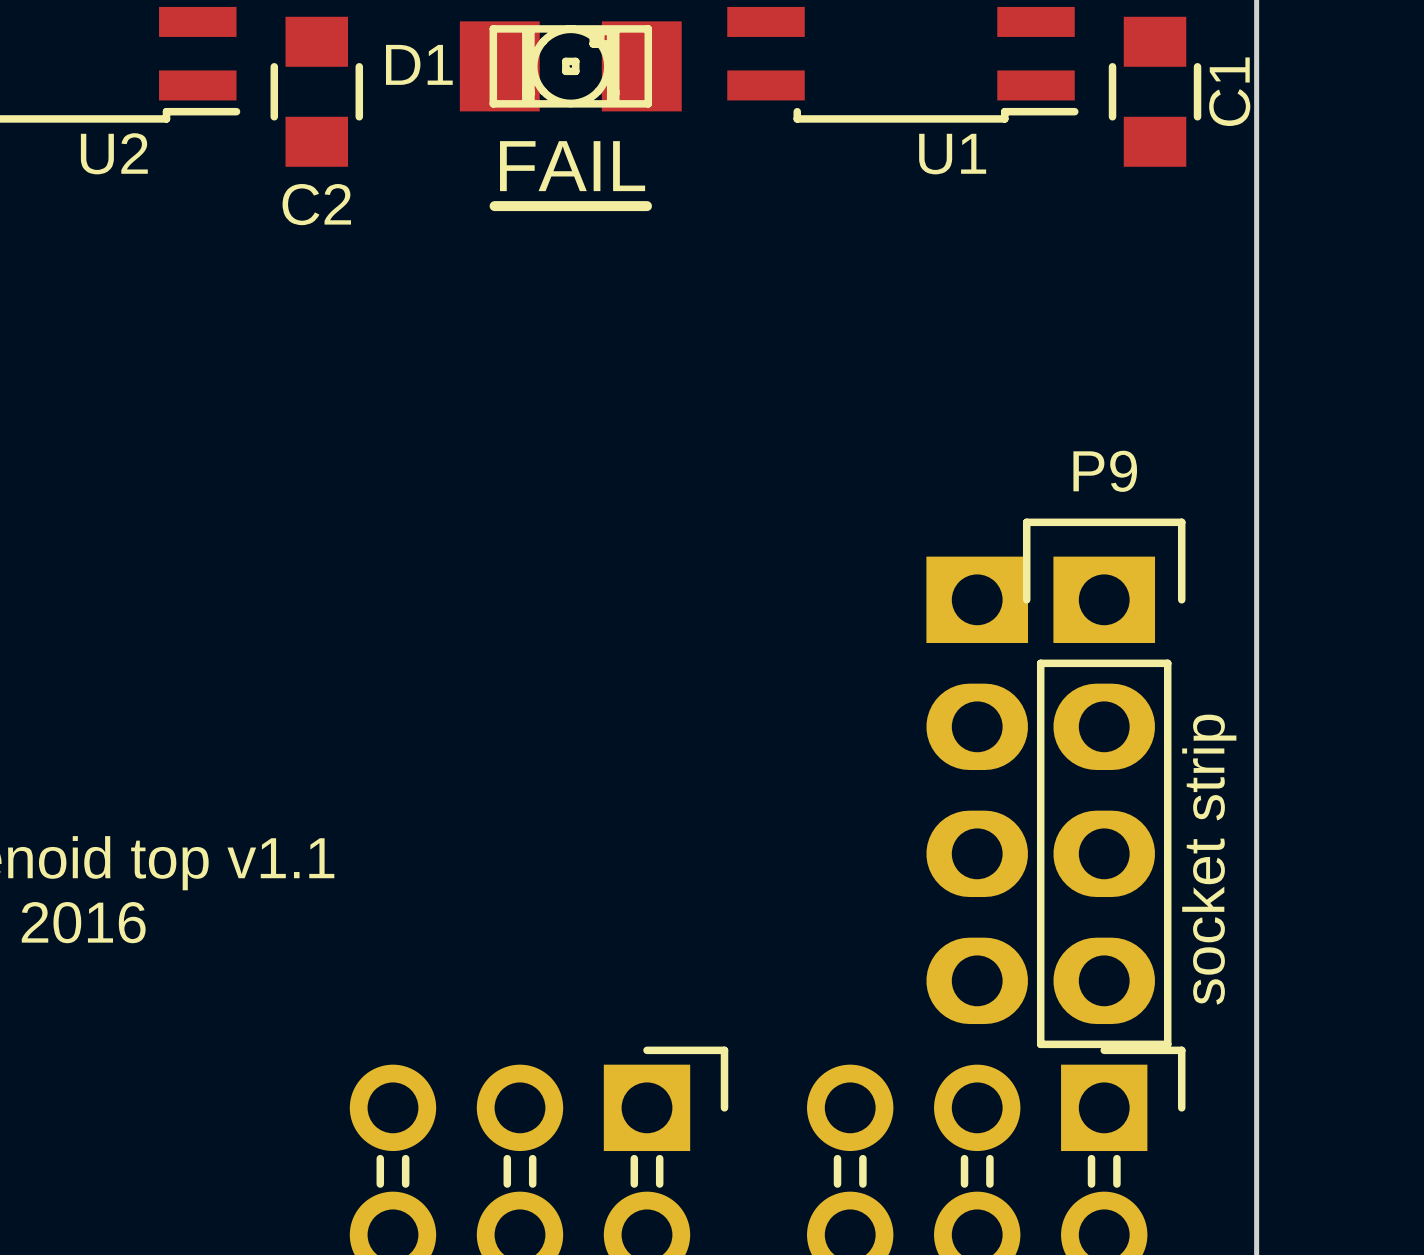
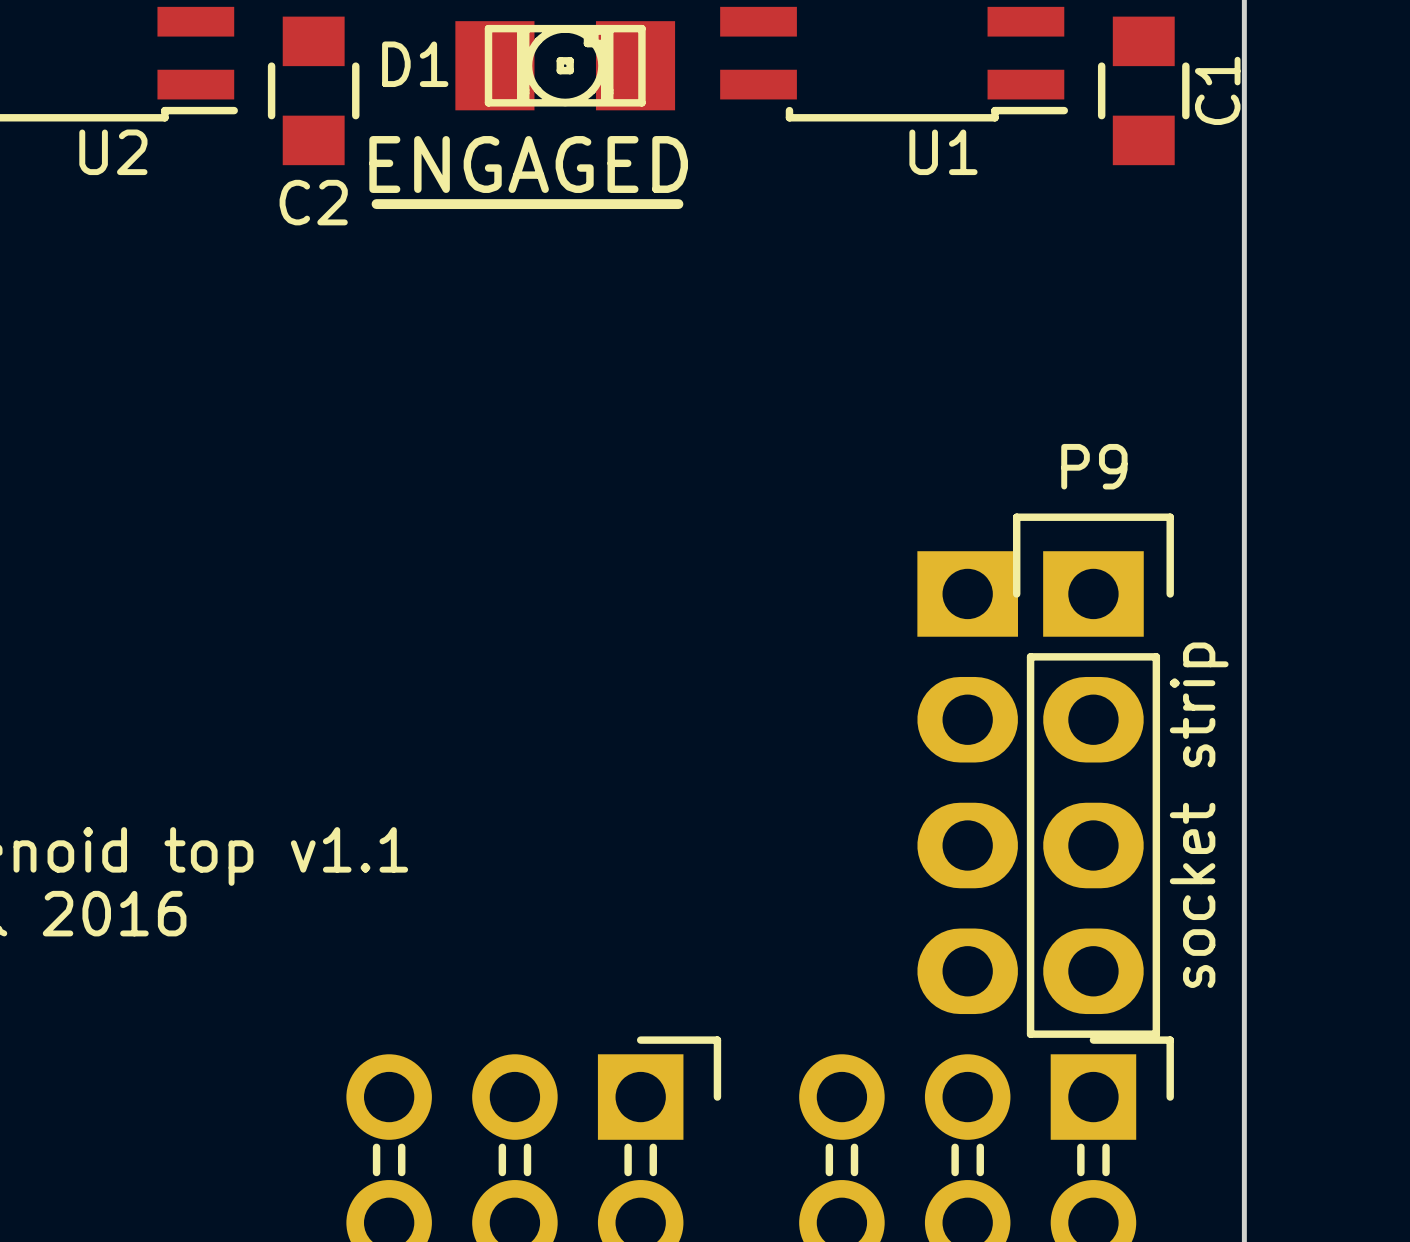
text: FAIL (572, 166) -> ENGAGED (528, 164)
line: none -> (376, 204) (489, 204)
line: none -> (640, 204) (678, 204)

